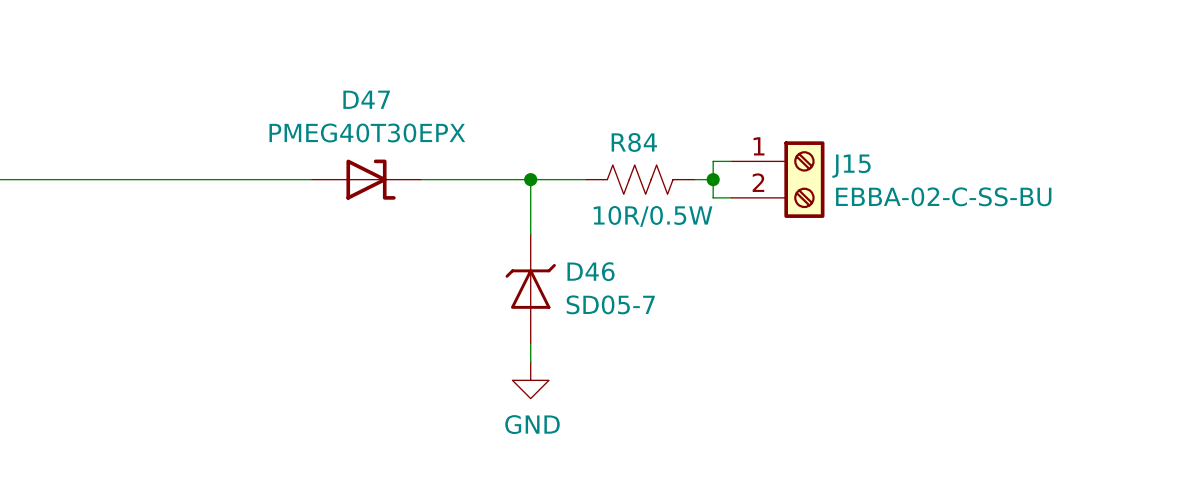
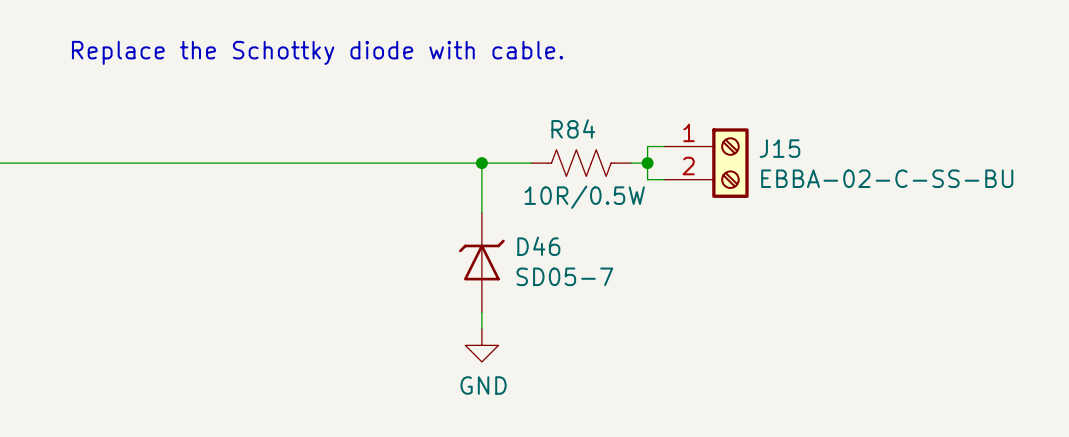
text: none -> Replace the Schottky diode with cable. (317, 52)
D47: PMEG40T30EPX (366, 179) -> none

